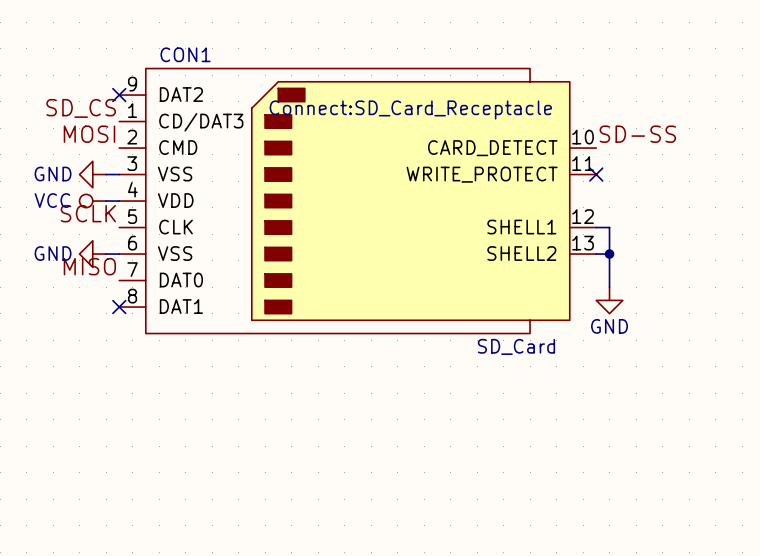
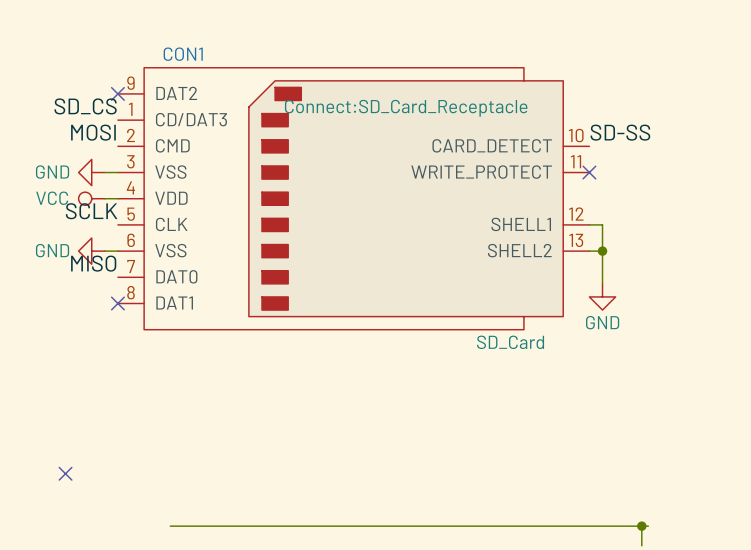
no-connect mark: none -> (65, 473)
wire: none -> (170, 526) (648, 526)
wire: none -> (641, 526) (641, 545)
junction: none -> (641, 526)

